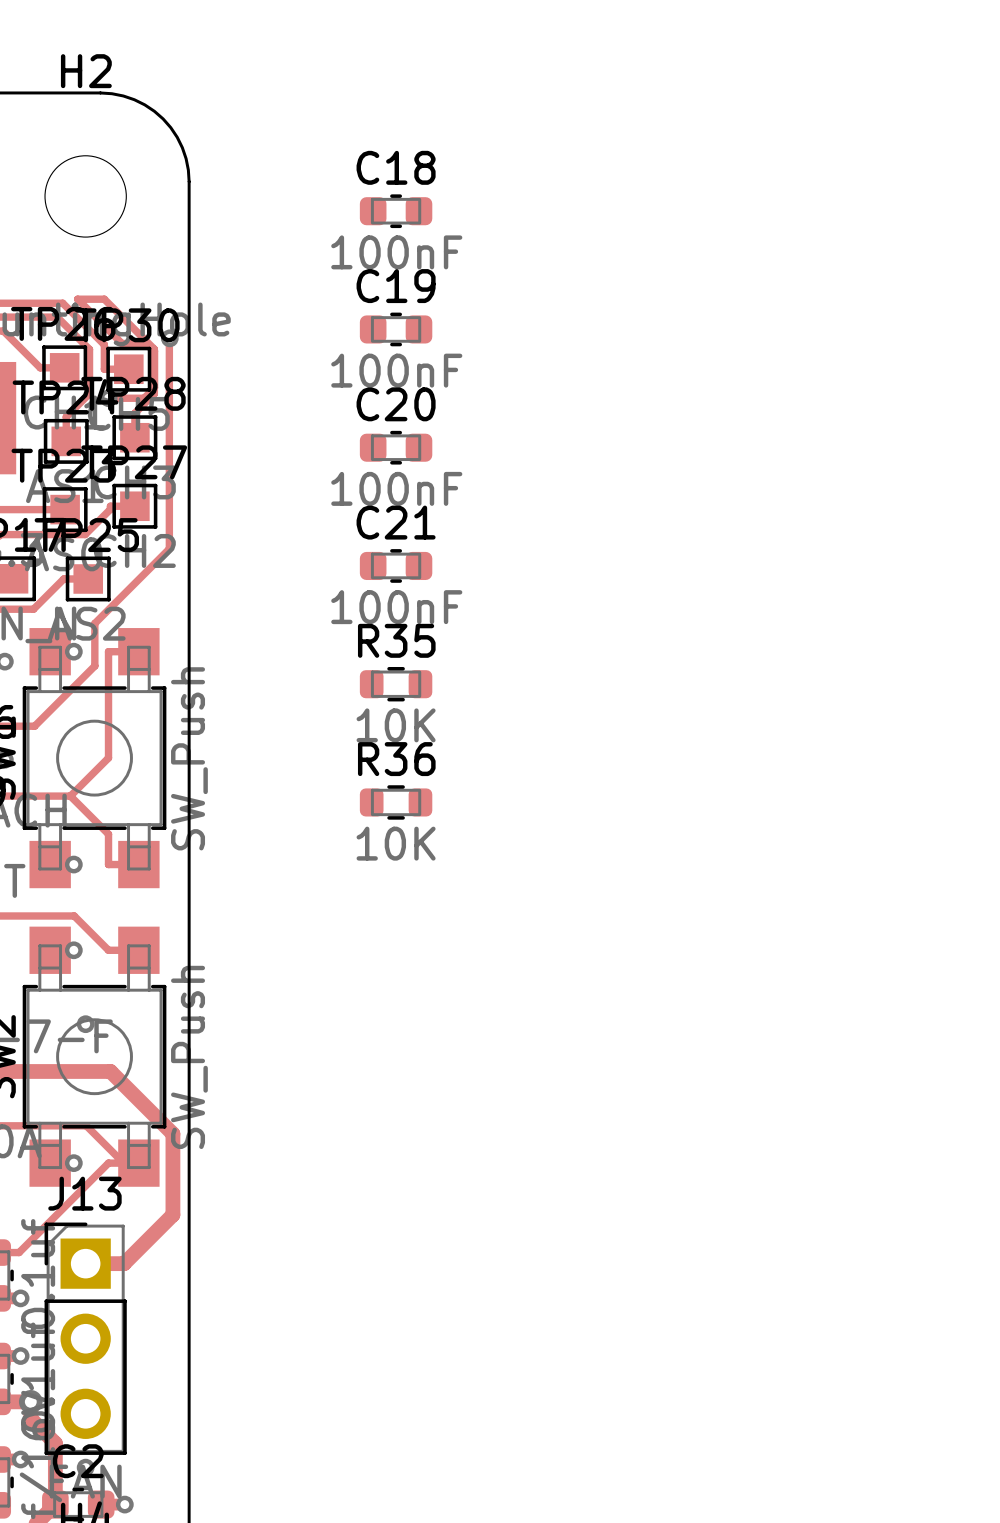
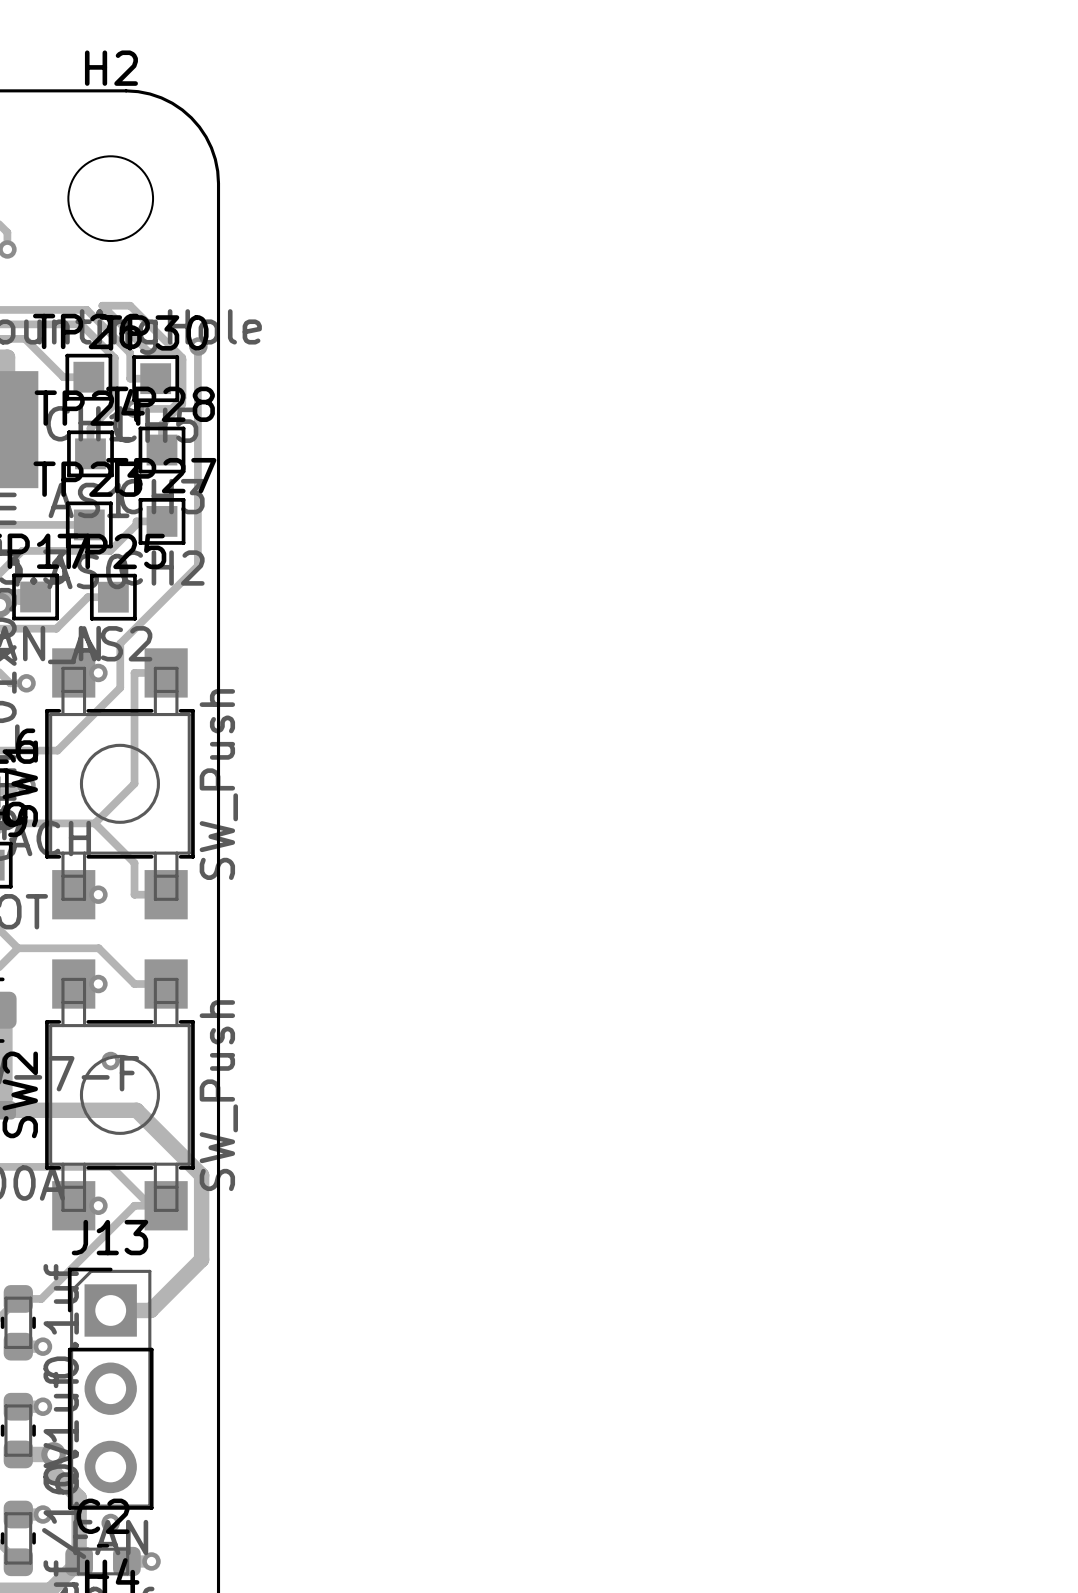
C18: 100nF (396, 211) -> none
C19: 100nF (396, 329) -> none
C20: 100nF (396, 447) -> none
C21: 100nF (396, 565) -> none
R35: 10K (396, 684) -> none
R36: 10K (396, 802) -> none

